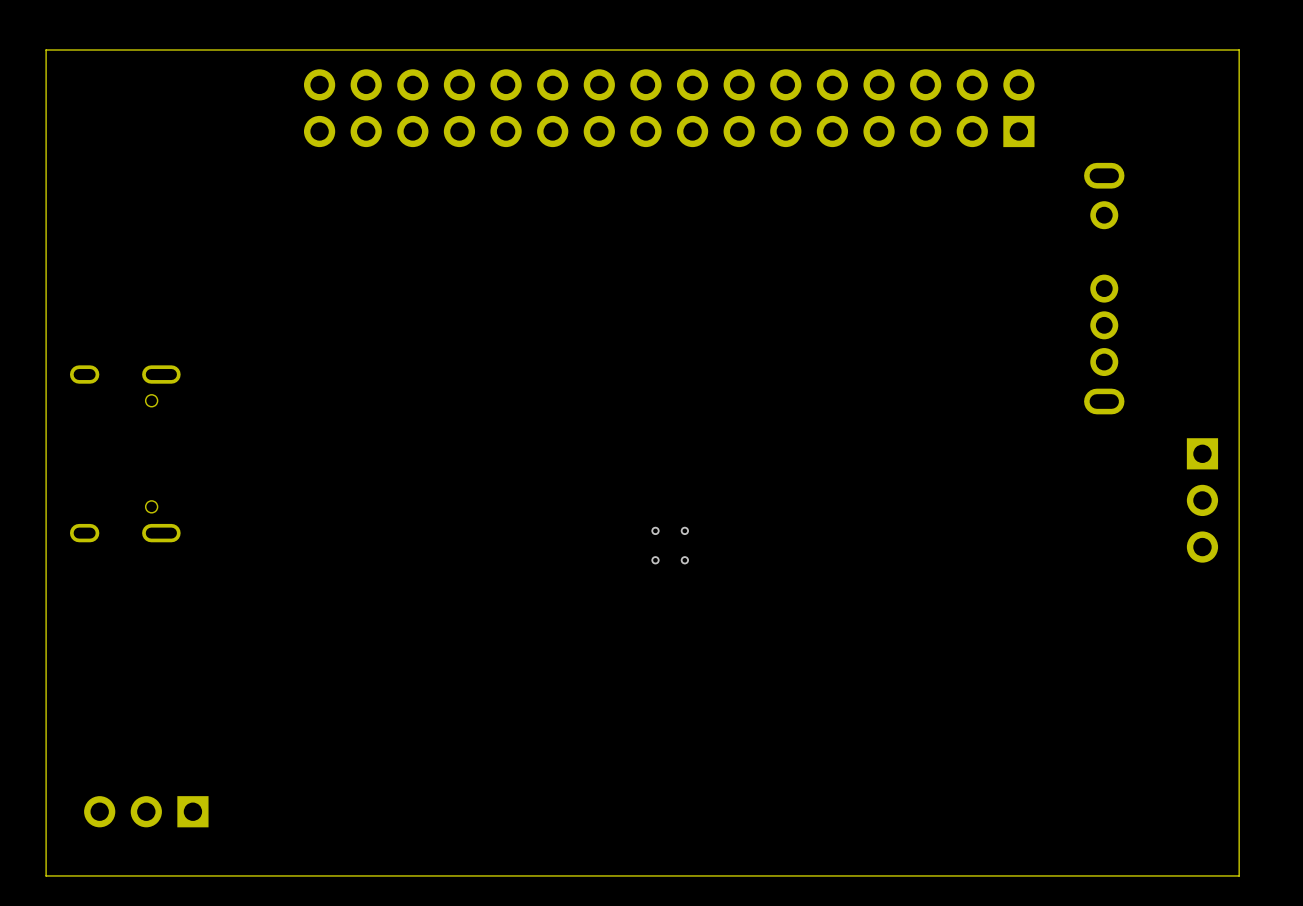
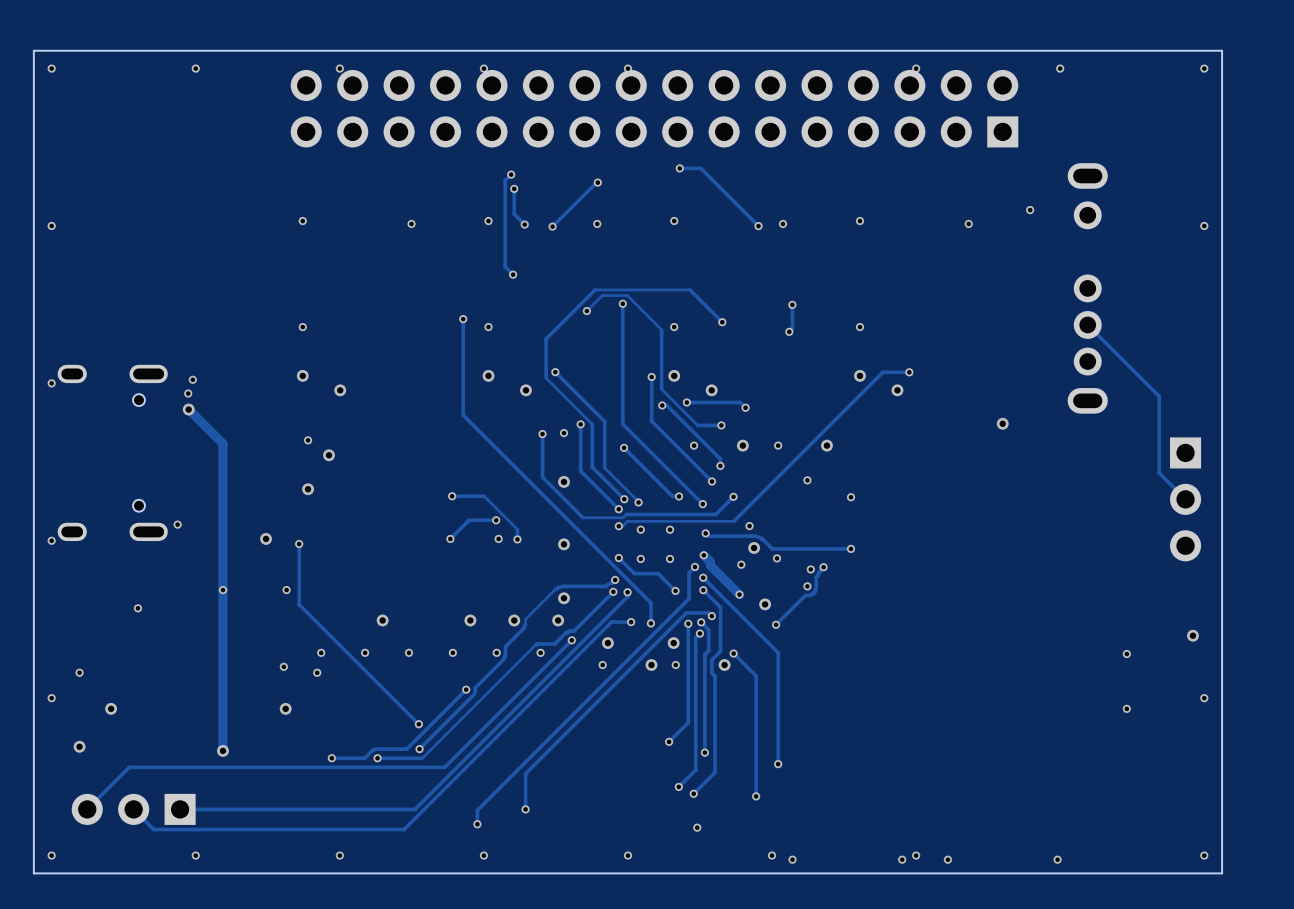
via: none -> (51, 68)
via: none -> (195, 68)
via: none -> (339, 68)
via: none -> (483, 68)
via: none -> (627, 68)
via: none -> (916, 68)
via: none -> (1060, 68)
via: none -> (1204, 68)
track: none -> (679, 168) (700, 168) (758, 226)
via: none -> (679, 168)
track: none -> (511, 174) (505, 180) (505, 266) (513, 274)
via: none -> (511, 174)
track: none -> (597, 182) (552, 226)
via: none -> (597, 182)
track: none -> (514, 188) (514, 214) (524, 224)
via: none -> (514, 188)
via: none -> (1030, 210)
via: none -> (302, 221)
via: none -> (488, 221)
via: none -> (674, 221)
via: none -> (859, 221)
via: none -> (411, 223)
via: none -> (597, 223)
via: none -> (783, 223)
via: none -> (968, 223)
via: none -> (524, 224)
via: none -> (51, 225)
via: none -> (1204, 225)
via: none -> (552, 226)
via: none -> (758, 226)
via: none -> (513, 274)
track: none -> (622, 303) (622, 424) (702, 504)
via: none -> (622, 303)
track: none -> (792, 304) (792, 328) (789, 331)
via: none -> (792, 304)
track: none -> (586, 311) (602, 295) (627, 295) (661, 329) (661, 389) (697, 425) (721, 425)
via: none -> (586, 311)
track: none -> (463, 319) (463, 415) (650, 602) (650, 623)
via: none -> (463, 319)
track: none -> (722, 322) (690, 289) (595, 289) (546, 338) (546, 378) (592, 424) (592, 467) (624, 499)
via: none -> (722, 322)
track: none -> (1087, 324) (1159, 396) (1159, 473) (1185, 499)
via: none -> (302, 327)
via: none -> (488, 327)
via: none -> (674, 327)
via: none -> (859, 327)
via: none -> (789, 331)
track: none -> (555, 372) (604, 421) (604, 467) (638, 502)
via: none -> (555, 372)
track: none -> (909, 372) (882, 372) (733, 521) (627, 521) (622, 526) (618, 526)
via: none -> (909, 372)
via: none -> (302, 375)
via: none -> (488, 375)
via: none -> (674, 375)
via: none -> (859, 375)
track: none -> (651, 376) (651, 421) (711, 481)
via: none -> (651, 376)
via: none -> (192, 379)
via: none -> (51, 383)
via: none -> (340, 390)
via: none -> (525, 390)
via: none -> (711, 390)
via: none -> (897, 390)
via: none -> (188, 393)
track: none -> (686, 402) (740, 402) (745, 407)
via: none -> (686, 402)
track: none -> (662, 405) (666, 405) (720, 458) (720, 465)
via: none -> (662, 405)
via: none -> (745, 407)
track: none -> (188, 409) (222, 443) (222, 750)
via: none -> (188, 409)
via: none -> (1002, 423)
track: none -> (580, 424) (580, 471) (618, 509)
via: none -> (580, 424)
via: none -> (721, 425)
via: none -> (564, 433)
track: none -> (542, 434) (542, 477) (582, 517) (622, 517) (626, 514) (715, 514) (733, 496)
via: none -> (542, 434)
via: none -> (308, 440)
via: none -> (694, 445)
via: none -> (742, 445)
via: none -> (778, 445)
via: none -> (826, 445)
track: none -> (624, 447) (672, 496) (679, 496)
via: none -> (624, 447)
via: none -> (329, 455)
via: none -> (720, 465)
via: none -> (807, 480)
via: none -> (564, 481)
via: none -> (711, 481)
via: none -> (308, 489)
track: none -> (452, 496) (484, 496) (517, 529) (517, 539)
via: none -> (452, 496)
via: none -> (679, 496)
via: none -> (733, 496)
via: none -> (851, 497)
via: none -> (624, 499)
via: none -> (638, 502)
via: none -> (702, 504)
via: none -> (618, 509)
track: none -> (496, 520) (469, 520) (450, 538)
via: none -> (496, 520)
via: none -> (177, 524)
via: none -> (618, 526)
via: none -> (749, 526)
track: none -> (705, 533) (708, 536) (755, 536) (762, 538) (772, 548) (851, 548)
via: none -> (705, 533)
via: none -> (266, 538)
via: none -> (450, 538)
via: none -> (498, 538)
via: none -> (517, 539)
via: none -> (51, 540)
track: none -> (299, 543) (299, 604) (418, 724)
via: none -> (299, 543)
via: none -> (564, 544)
via: none -> (754, 547)
via: none -> (851, 548)
track: none -> (703, 555) (710, 561) (710, 565) (739, 594)
via: none -> (703, 555)
track: none -> (618, 558) (634, 573) (658, 573) (675, 590)
via: none -> (618, 558)
via: none -> (776, 558)
via: none -> (741, 564)
track: none -> (695, 566) (689, 572) (689, 598) (477, 810) (477, 824)
via: none -> (695, 566)
track: none -> (823, 567) (816, 577) (814, 592) (805, 595) (776, 624)
via: none -> (823, 567)
via: none -> (810, 569)
track: none -> (703, 577) (778, 652) (778, 764)
via: none -> (703, 577)
track: none -> (615, 579) (606, 586) (562, 586) (555, 589) (525, 619) (523, 628) (505, 646) (503, 659) (475, 687) (474, 694) (419, 749)
via: none -> (615, 579)
via: none -> (807, 586)
via: none -> (223, 590)
via: none -> (286, 590)
track: none -> (703, 590) (720, 607) (720, 651) (711, 659) (711, 673) (715, 676) (715, 772) (693, 793)
via: none -> (703, 590)
via: none -> (675, 590)
track: none -> (613, 591) (574, 631) (565, 633) (554, 643) (535, 644) (422, 758) (377, 758)
via: none -> (613, 591)
track: none -> (627, 592) (627, 596) (415, 809) (180, 809)
via: none -> (627, 592)
via: none -> (739, 594)
via: none -> (564, 598)
via: none -> (765, 604)
via: none -> (137, 608)
track: none -> (711, 616) (708, 612) (686, 612) (525, 773) (525, 809)
via: none -> (711, 616)
via: none -> (382, 620)
via: none -> (470, 620)
via: none -> (514, 620)
via: none -> (558, 620)
track: none -> (631, 622) (611, 622) (404, 829) (153, 829) (133, 809)
via: none -> (631, 622)
track: none -> (701, 622) (708, 629) (708, 650) (704, 654) (704, 752)
via: none -> (701, 622)
via: none -> (650, 623)
track: none -> (688, 623) (688, 722) (669, 741)
via: none -> (688, 623)
via: none -> (776, 624)
track: none -> (699, 633) (695, 637) (695, 769) (678, 786)
via: none -> (699, 633)
via: none -> (1192, 635)
track: none -> (571, 640) (444, 767) (129, 767) (87, 809)
via: none -> (571, 640)
via: none -> (607, 643)
via: none -> (673, 643)
via: none -> (321, 652)
via: none -> (365, 652)
via: none -> (408, 652)
via: none -> (452, 652)
via: none -> (496, 652)
via: none -> (540, 652)
track: none -> (733, 653) (756, 676) (756, 796)
via: none -> (733, 653)
via: none -> (1126, 654)
via: none -> (602, 664)
via: none -> (651, 664)
via: none -> (675, 664)
via: none -> (724, 664)
via: none -> (283, 666)
via: none -> (79, 672)
via: none -> (317, 672)
track: none -> (466, 689) (406, 749) (375, 749) (364, 758) (331, 758)
via: none -> (466, 689)
via: none -> (51, 698)
via: none -> (1204, 698)
via: none -> (111, 708)
via: none -> (285, 708)
via: none -> (1126, 708)
via: none -> (418, 724)
via: none -> (669, 741)
via: none -> (79, 746)
via: none -> (419, 749)
via: none -> (222, 750)
via: none -> (704, 752)
via: none -> (331, 758)
via: none -> (377, 758)
via: none -> (778, 764)
via: none -> (678, 786)
via: none -> (693, 793)
via: none -> (756, 796)
via: none -> (525, 809)
via: none -> (477, 824)
via: none -> (697, 827)
via: none -> (51, 855)
via: none -> (195, 855)
via: none -> (339, 855)
via: none -> (483, 855)
via: none -> (627, 855)
via: none -> (772, 855)
via: none -> (916, 855)
via: none -> (1204, 855)
via: none -> (792, 859)
via: none -> (902, 859)
via: none -> (947, 859)
via: none -> (1057, 859)

